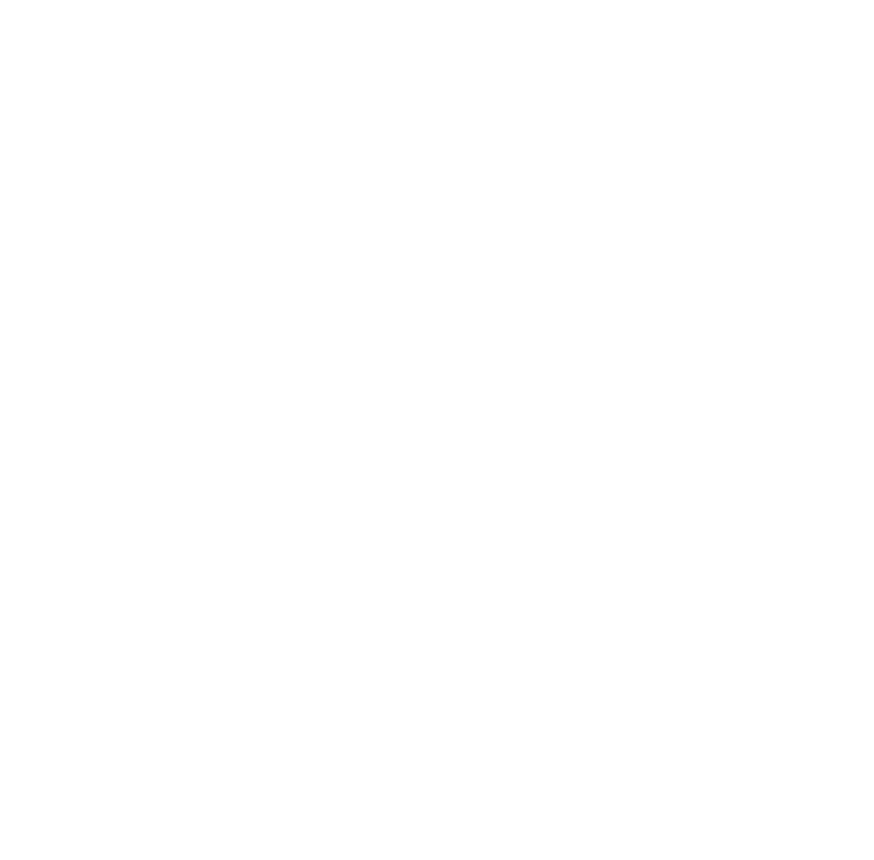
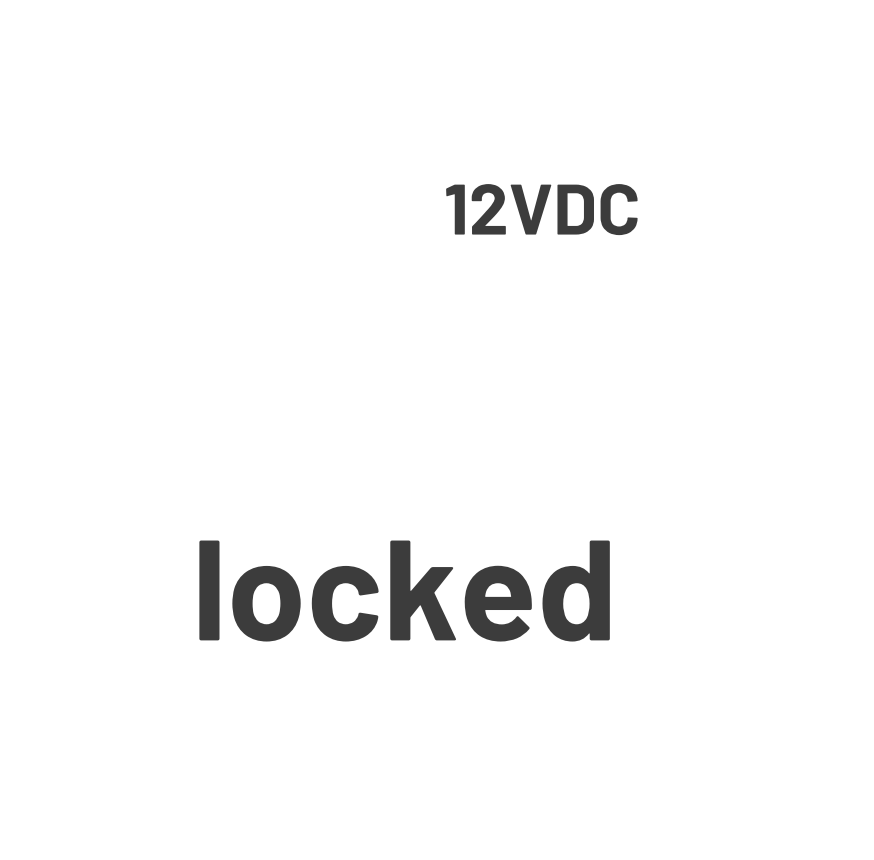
text: none -> 12VDC (541, 209)
text: none -> locked (404, 591)

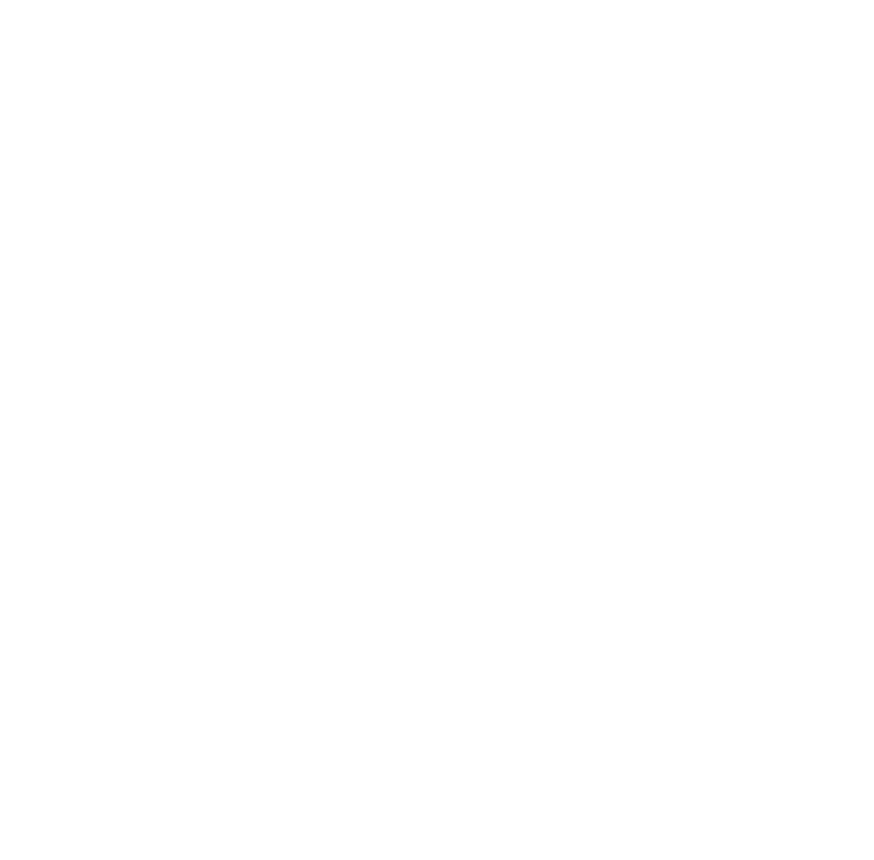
text: 12VDC (541, 209) -> none
text: locked (404, 591) -> none

